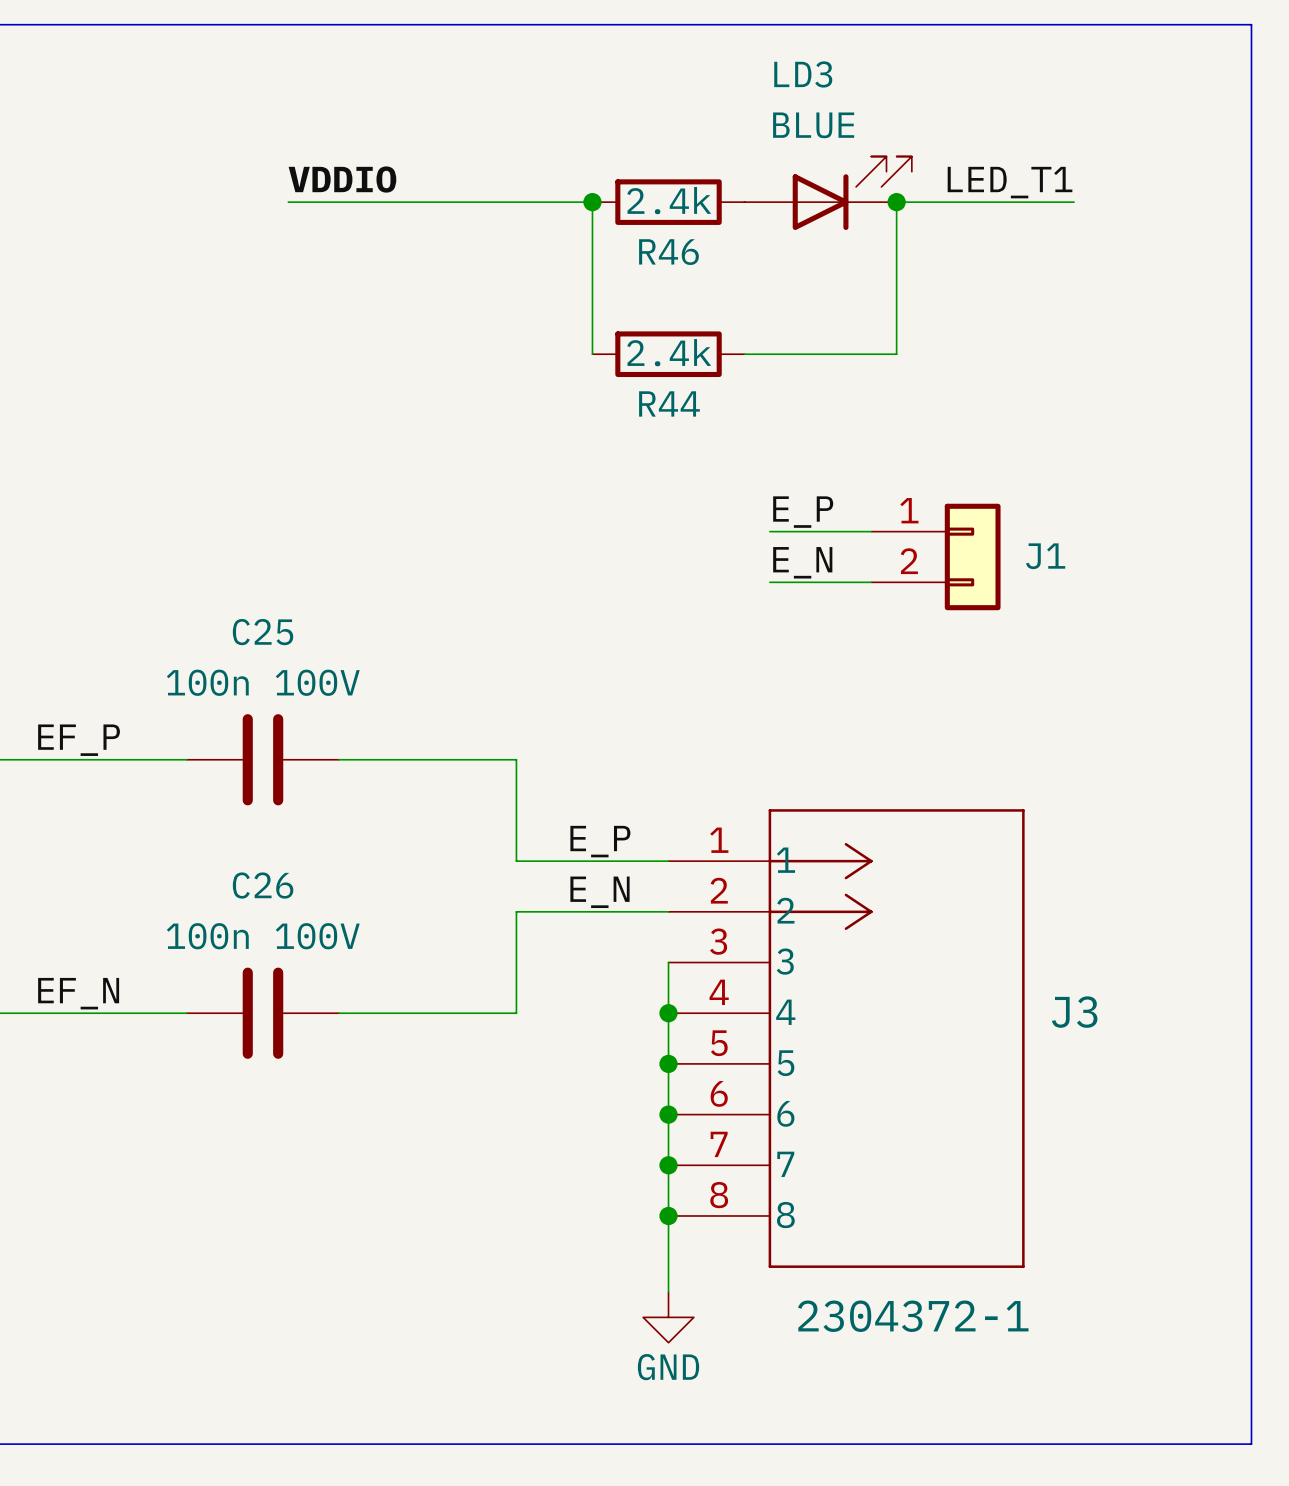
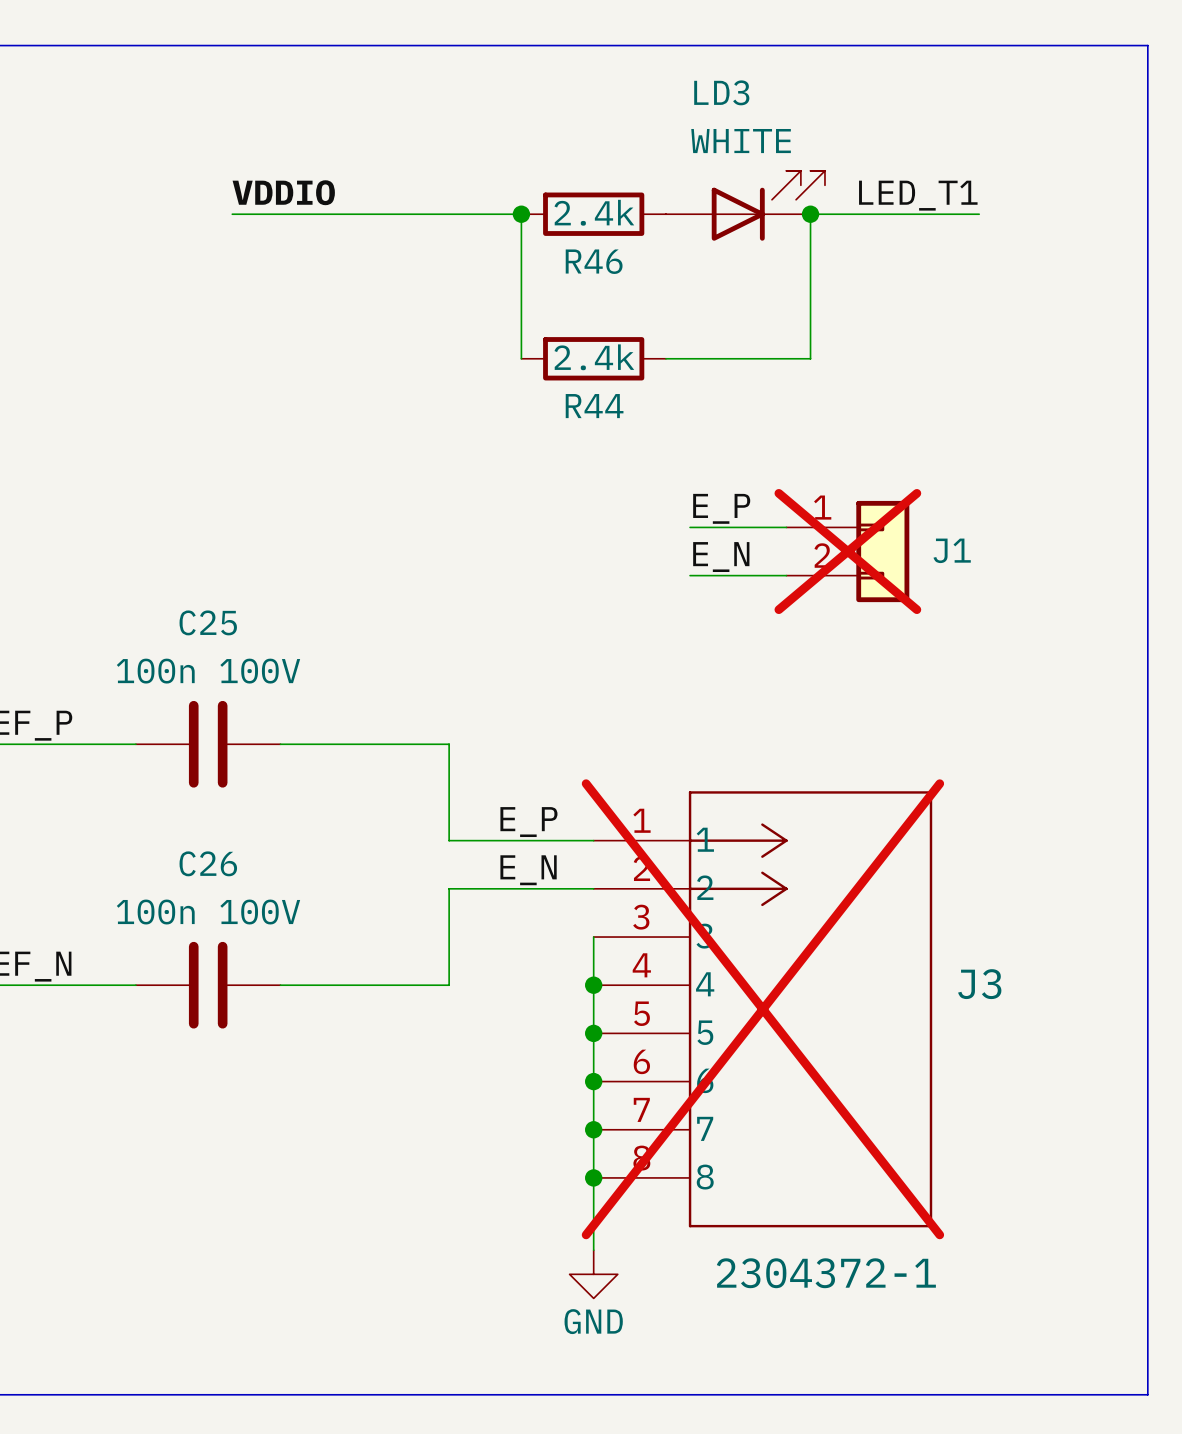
LD3 value: BLUE (813, 125) -> WHITE (741, 141)
J1 do-not-place cross: none -> (847, 551)
J3 do-not-place cross: none -> (762, 1009)

